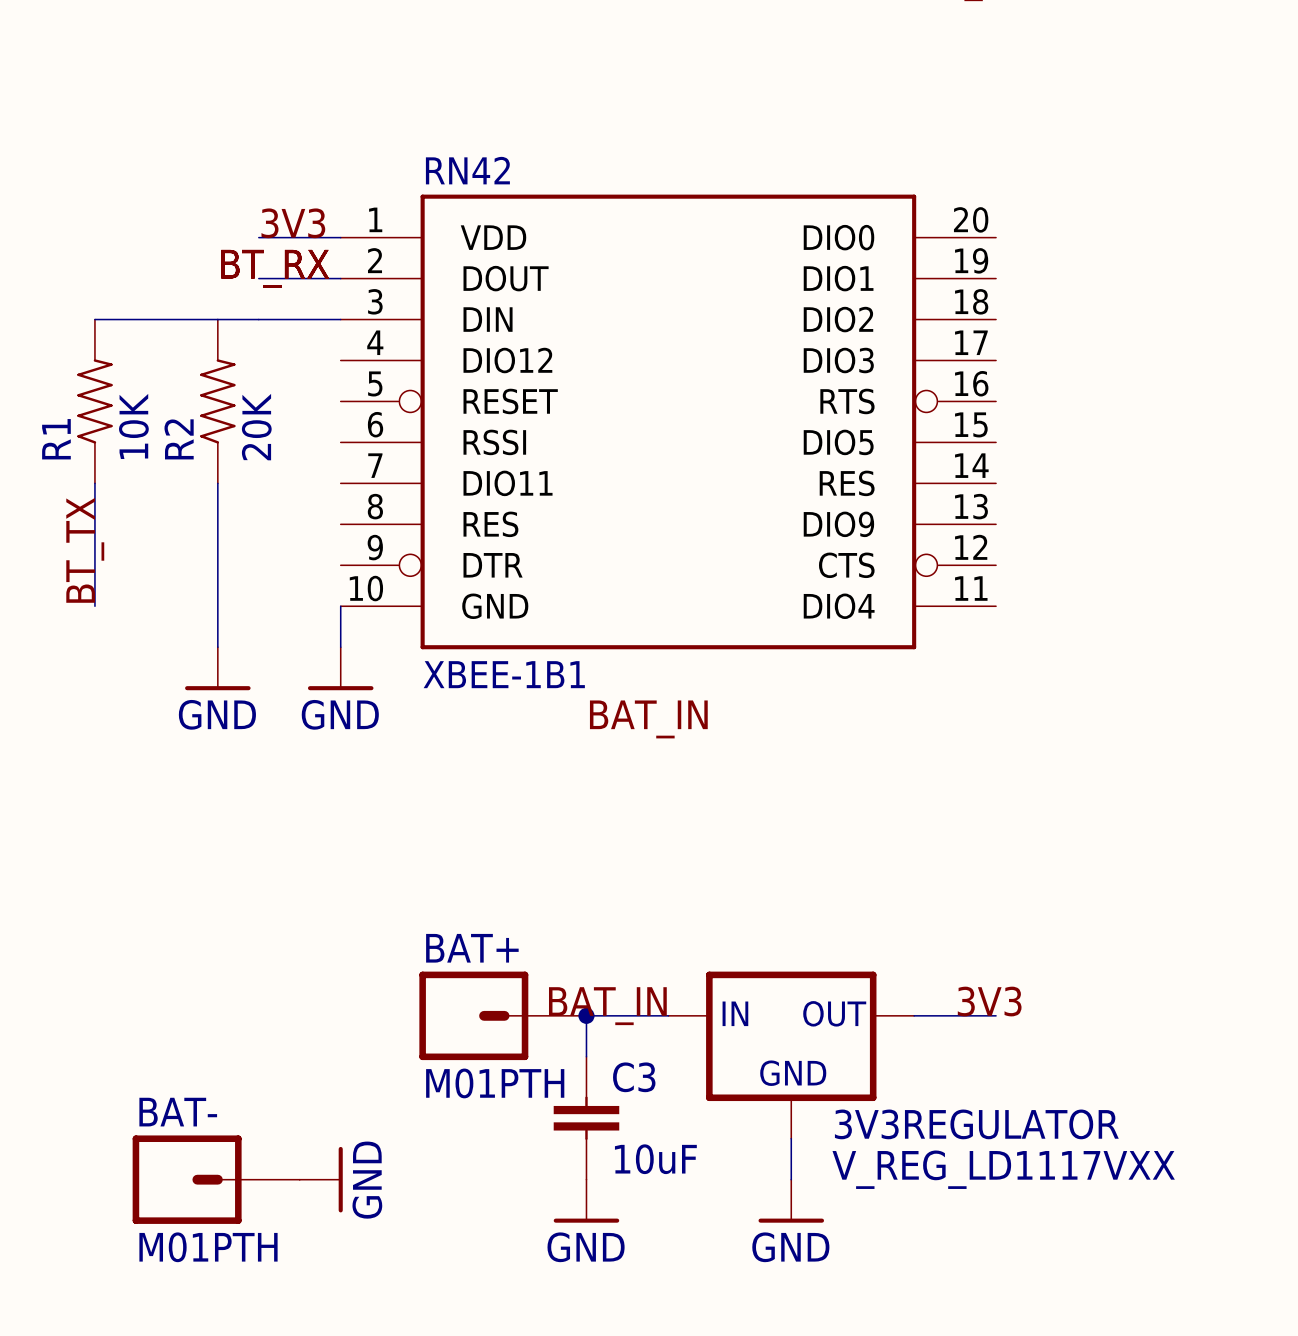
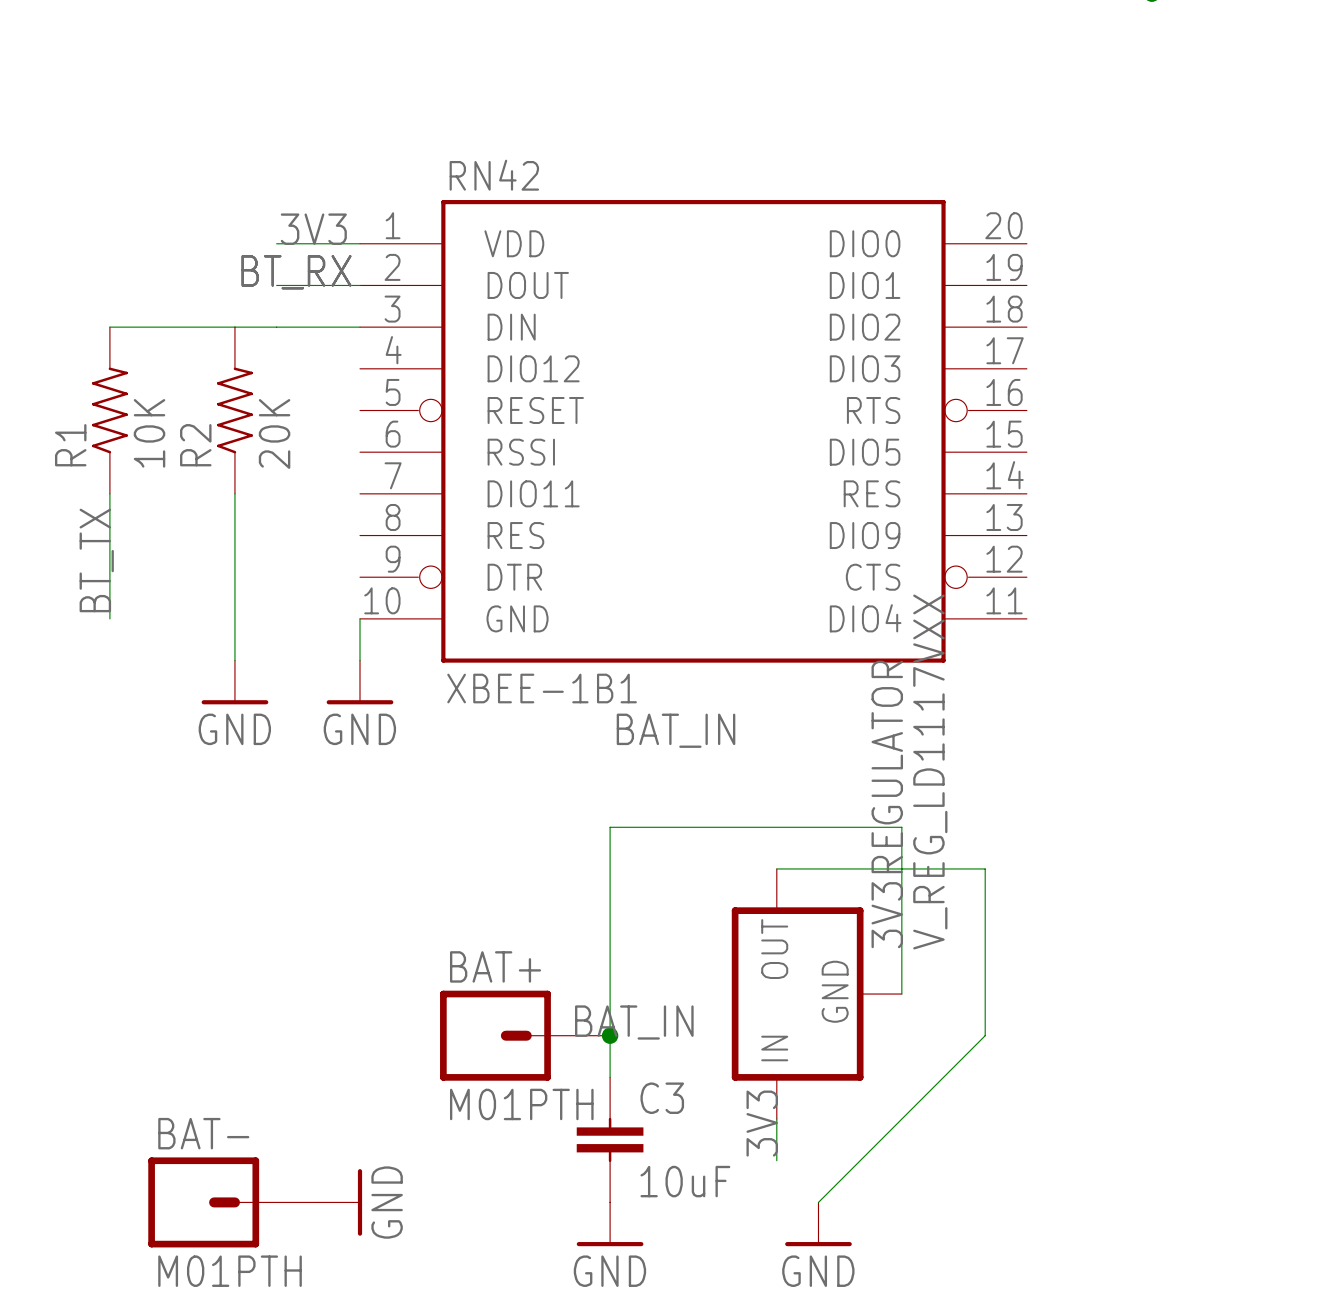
label rotation: 0° (989, 1001) -> 90° counterclockwise (762, 1123)
label position: 3V3 (989, 1001) -> 3V3 (762, 1123)
wire: (586, 1015) (668, 1015) -> (610, 1035) (610, 827) (901, 827) (901, 994)
wire: (914, 1015) (996, 1015) -> none
3V3REGULATOR rotation: 0° (791, 1036) -> 90° counterclockwise (797, 994)
wire: none -> (776, 1119) (776, 1160)
wire: (791, 1138) (791, 1179) -> (776, 868) (985, 868) (985, 1035) (818, 1202)

